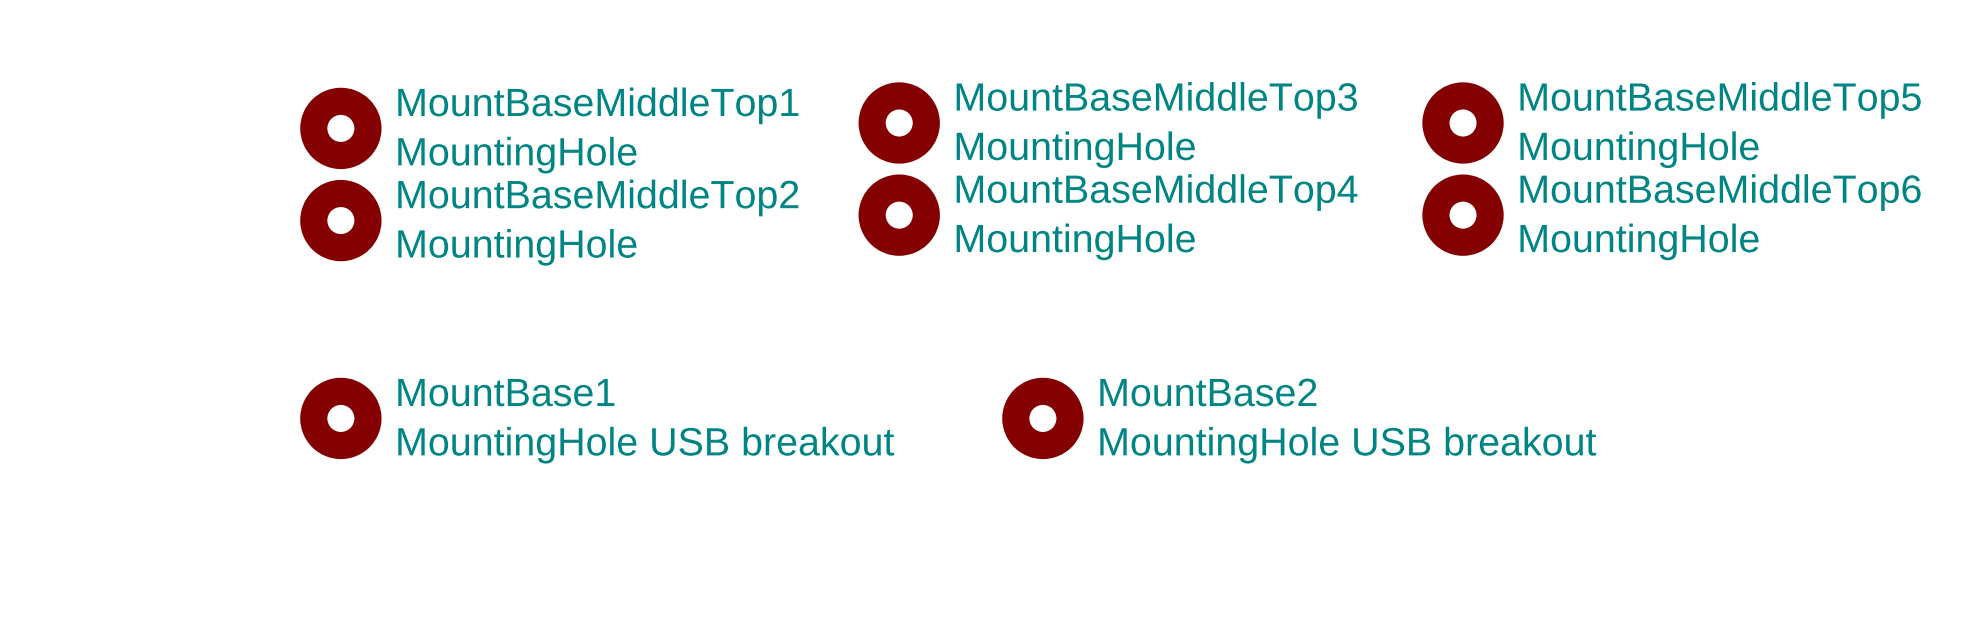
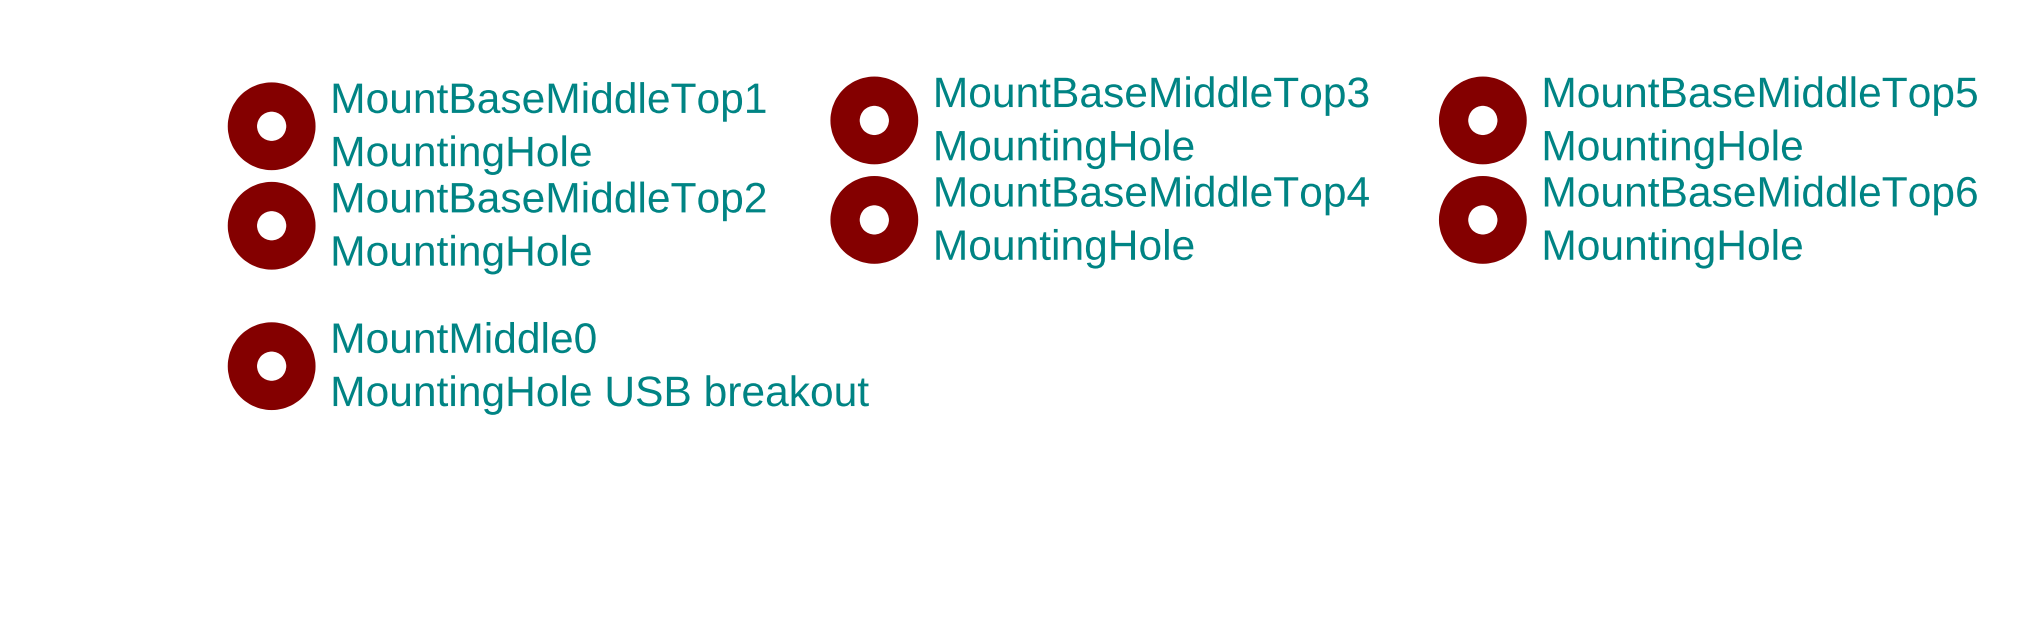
MountMiddle0: none -> MountingHole USB breakout (271, 366)
MountBase1: MountingHole USB breakout (340, 418) -> none
MountBase2: MountingHole USB breakout (1042, 418) -> none

